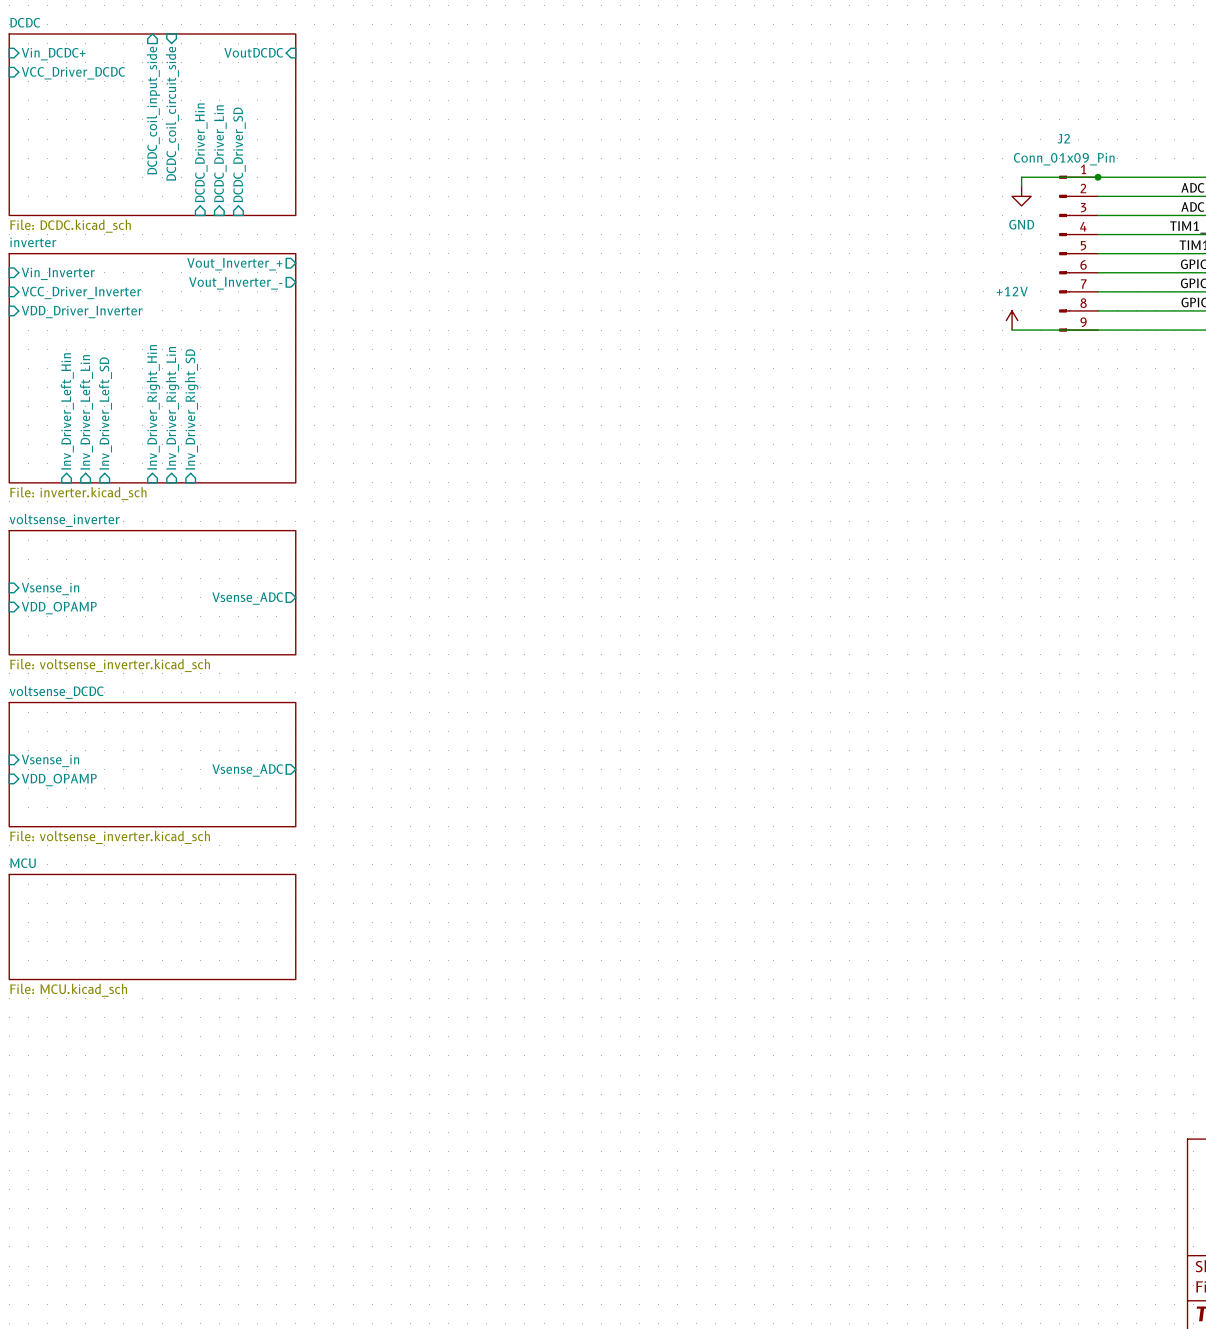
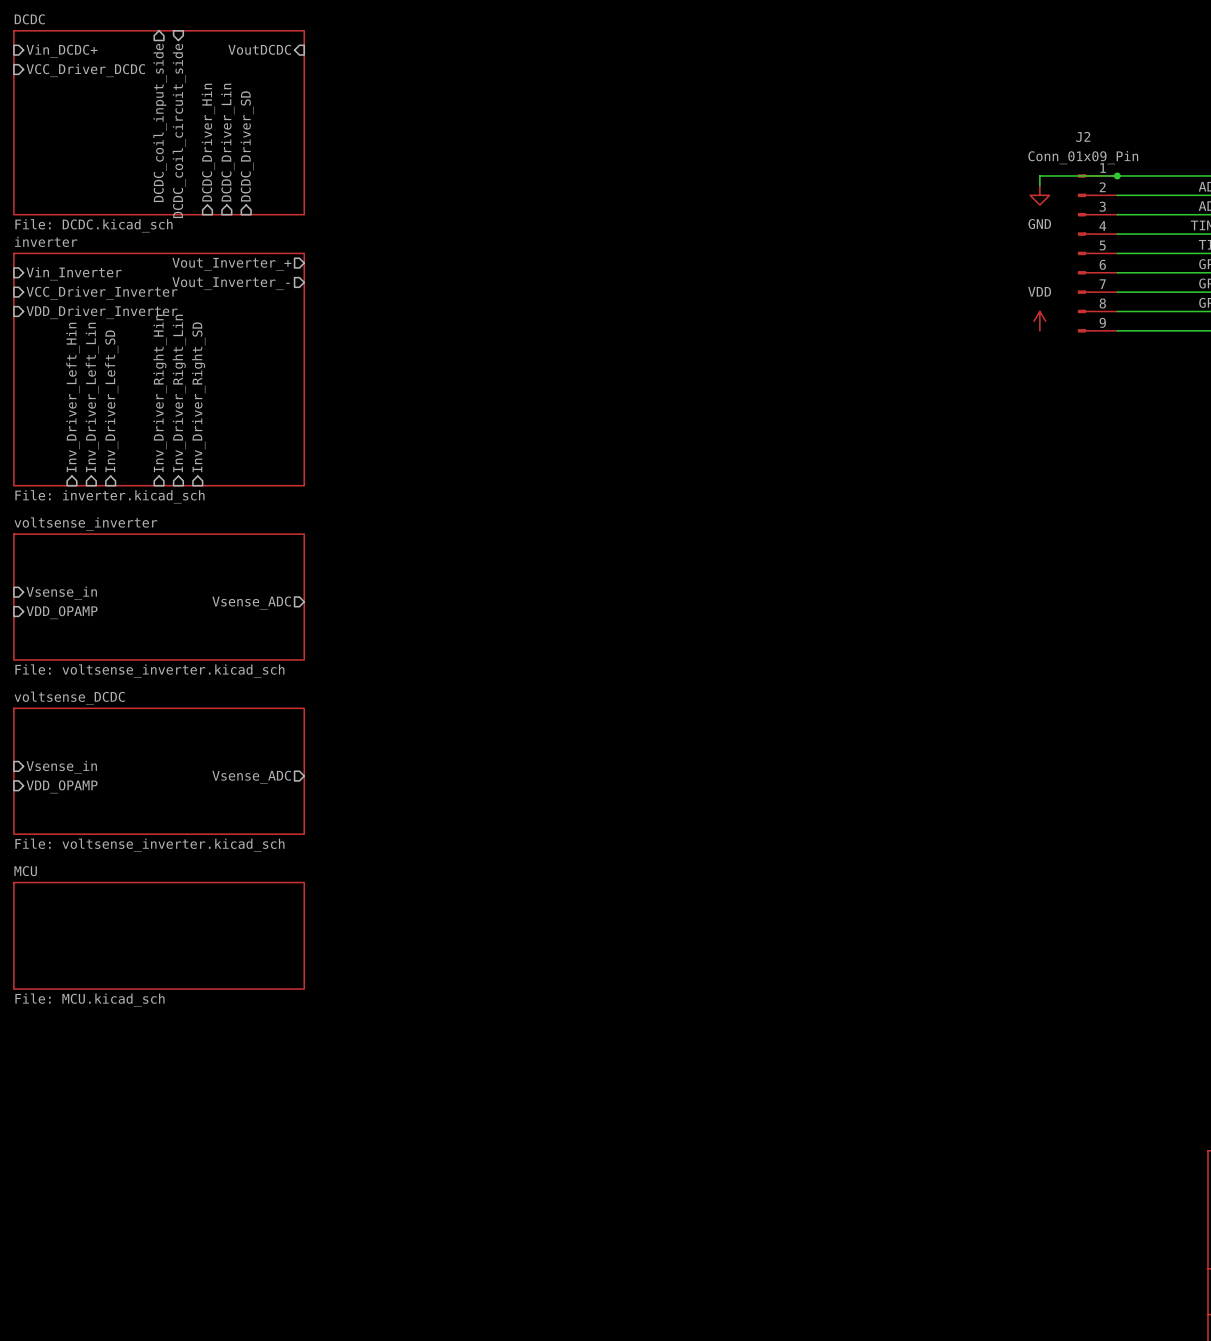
power symbol: +12V (1012, 320) -> none
power symbol: none -> VDD (1039, 321)
wire: (1012, 330) (1098, 330) -> none

